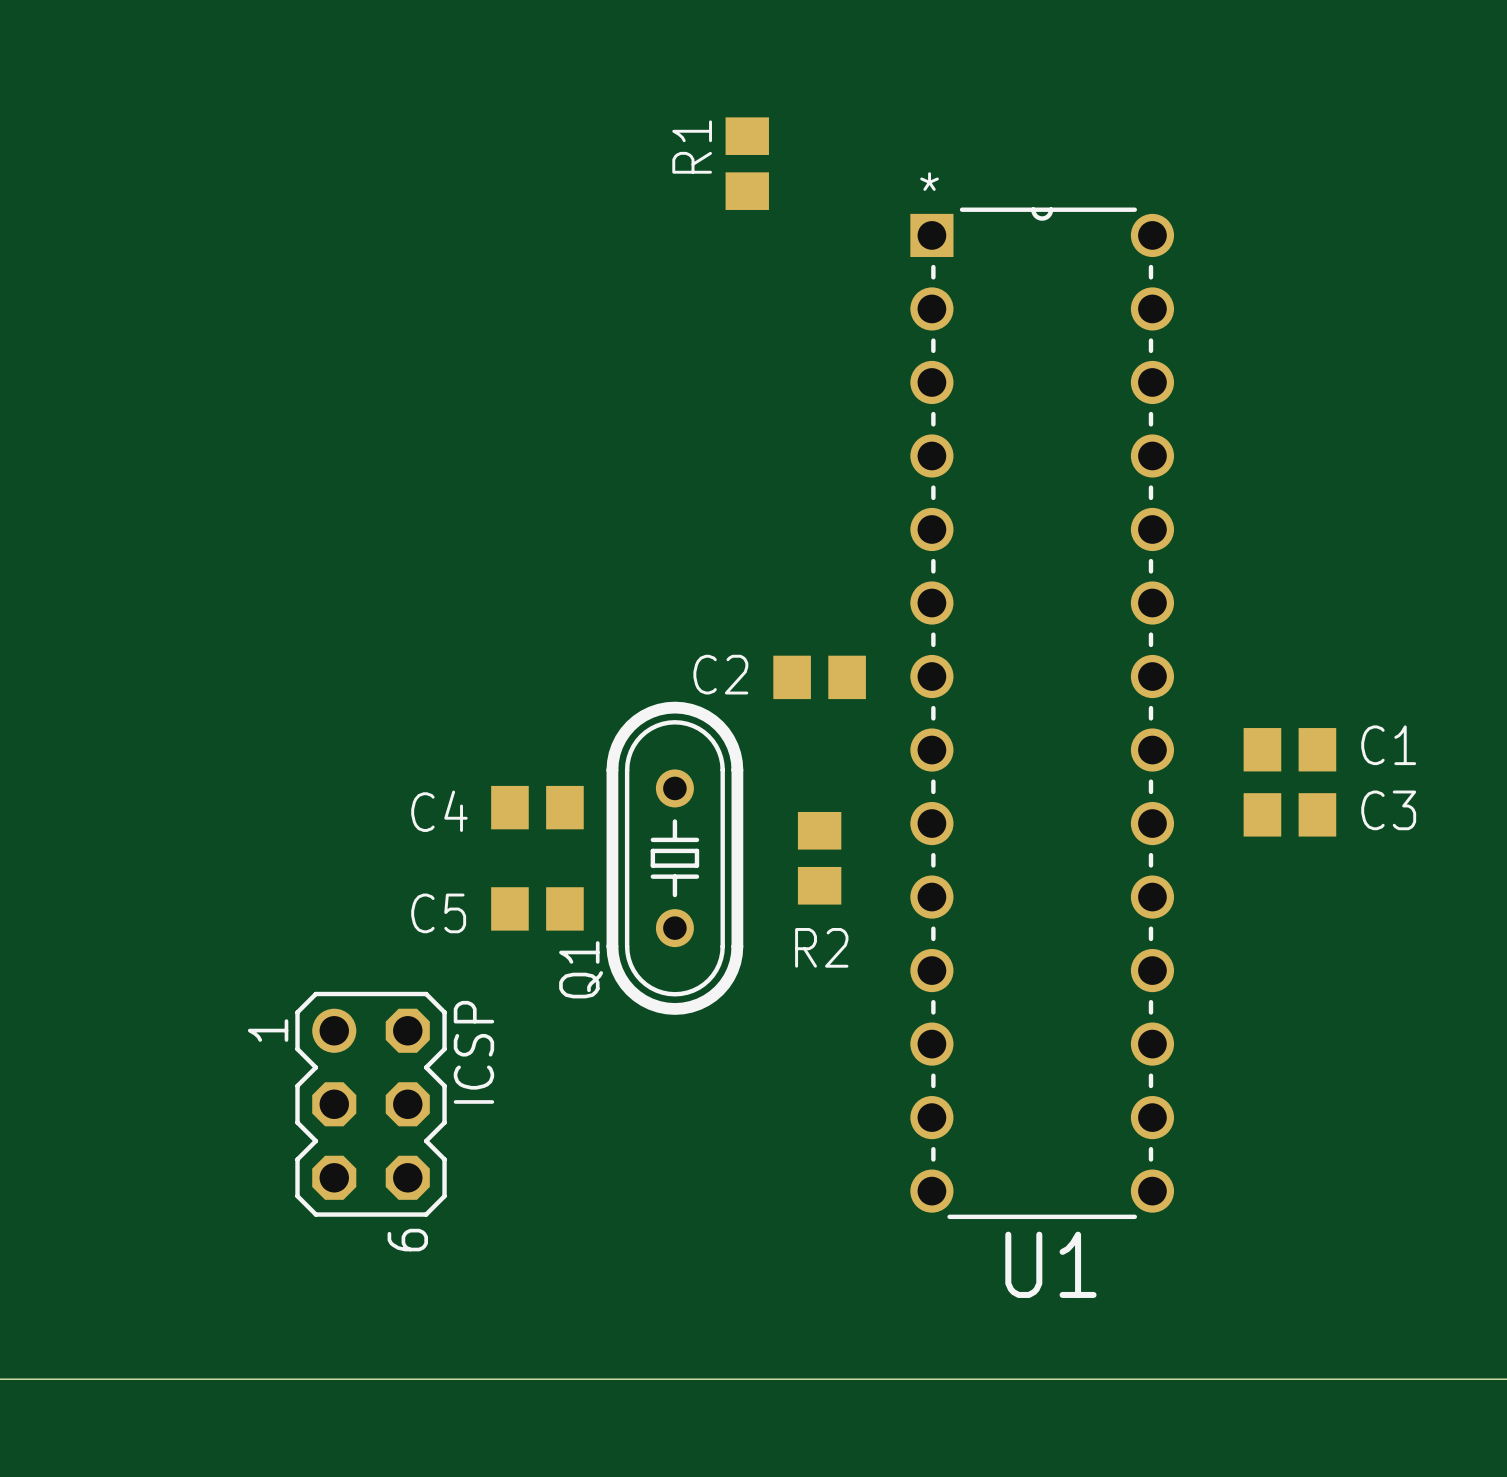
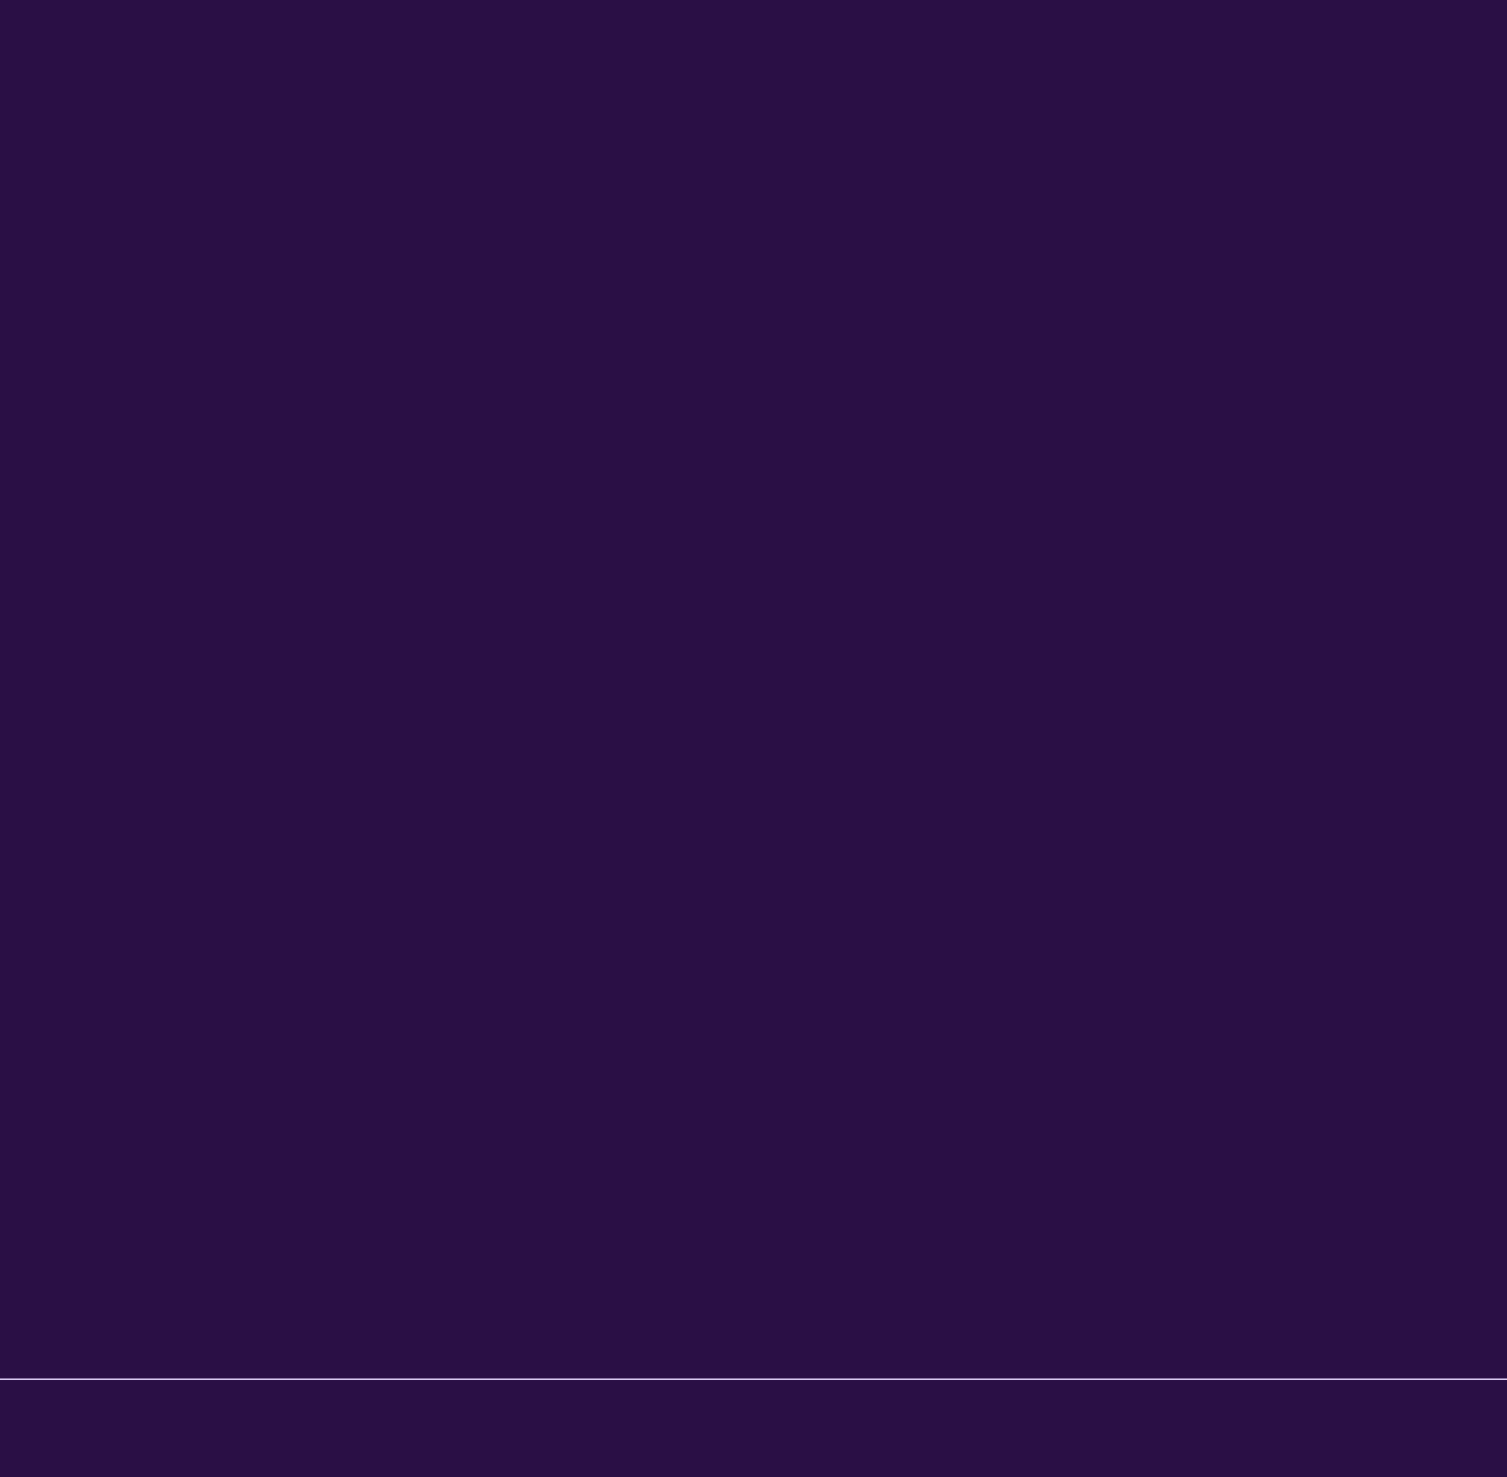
R1: (747, 163) -> none
C2: (819, 677) -> none
U1: (1042, 713) -> none
C1: (1289, 749) -> none
C4: (537, 807) -> none
C3: (1289, 814) -> none
Q1: (674, 858) -> none
R2: (819, 858) -> none
C5: (537, 908) -> none
ICSP: (371, 1104) -> none

